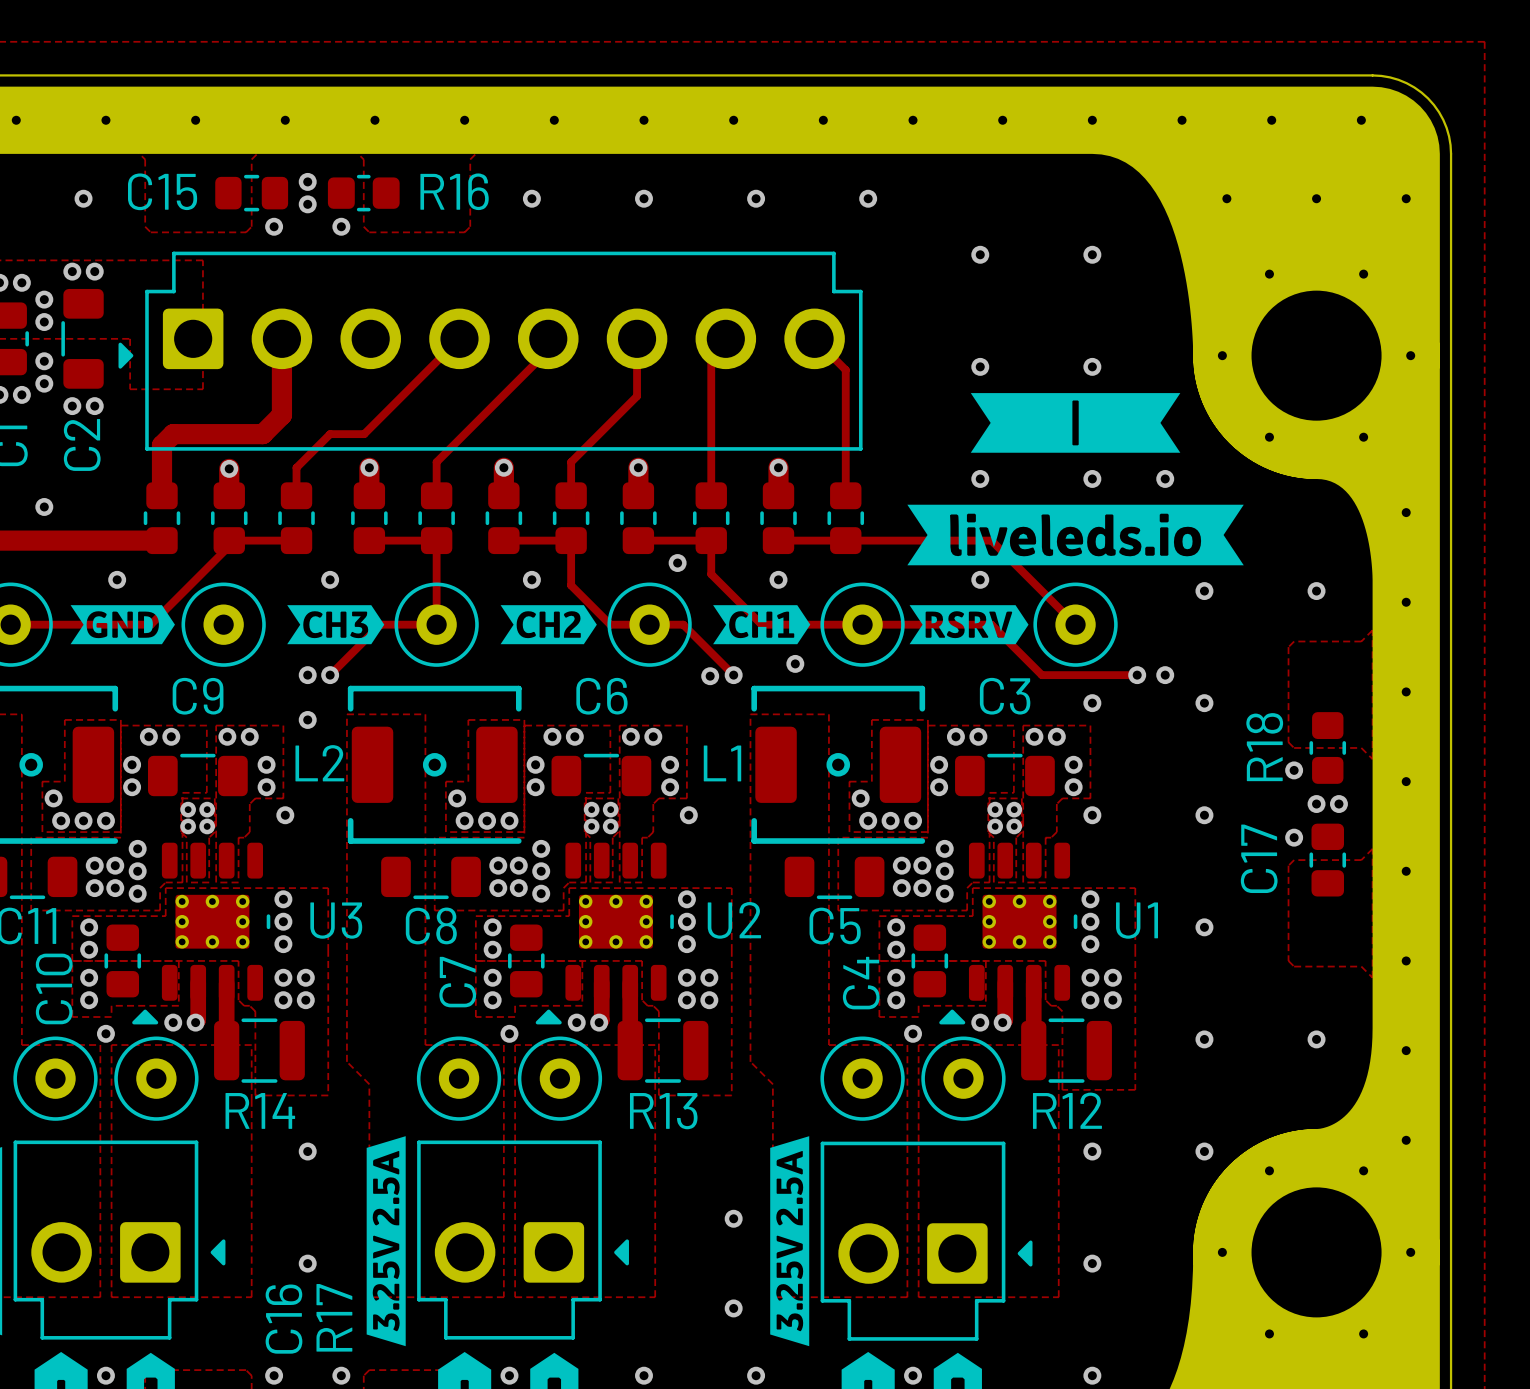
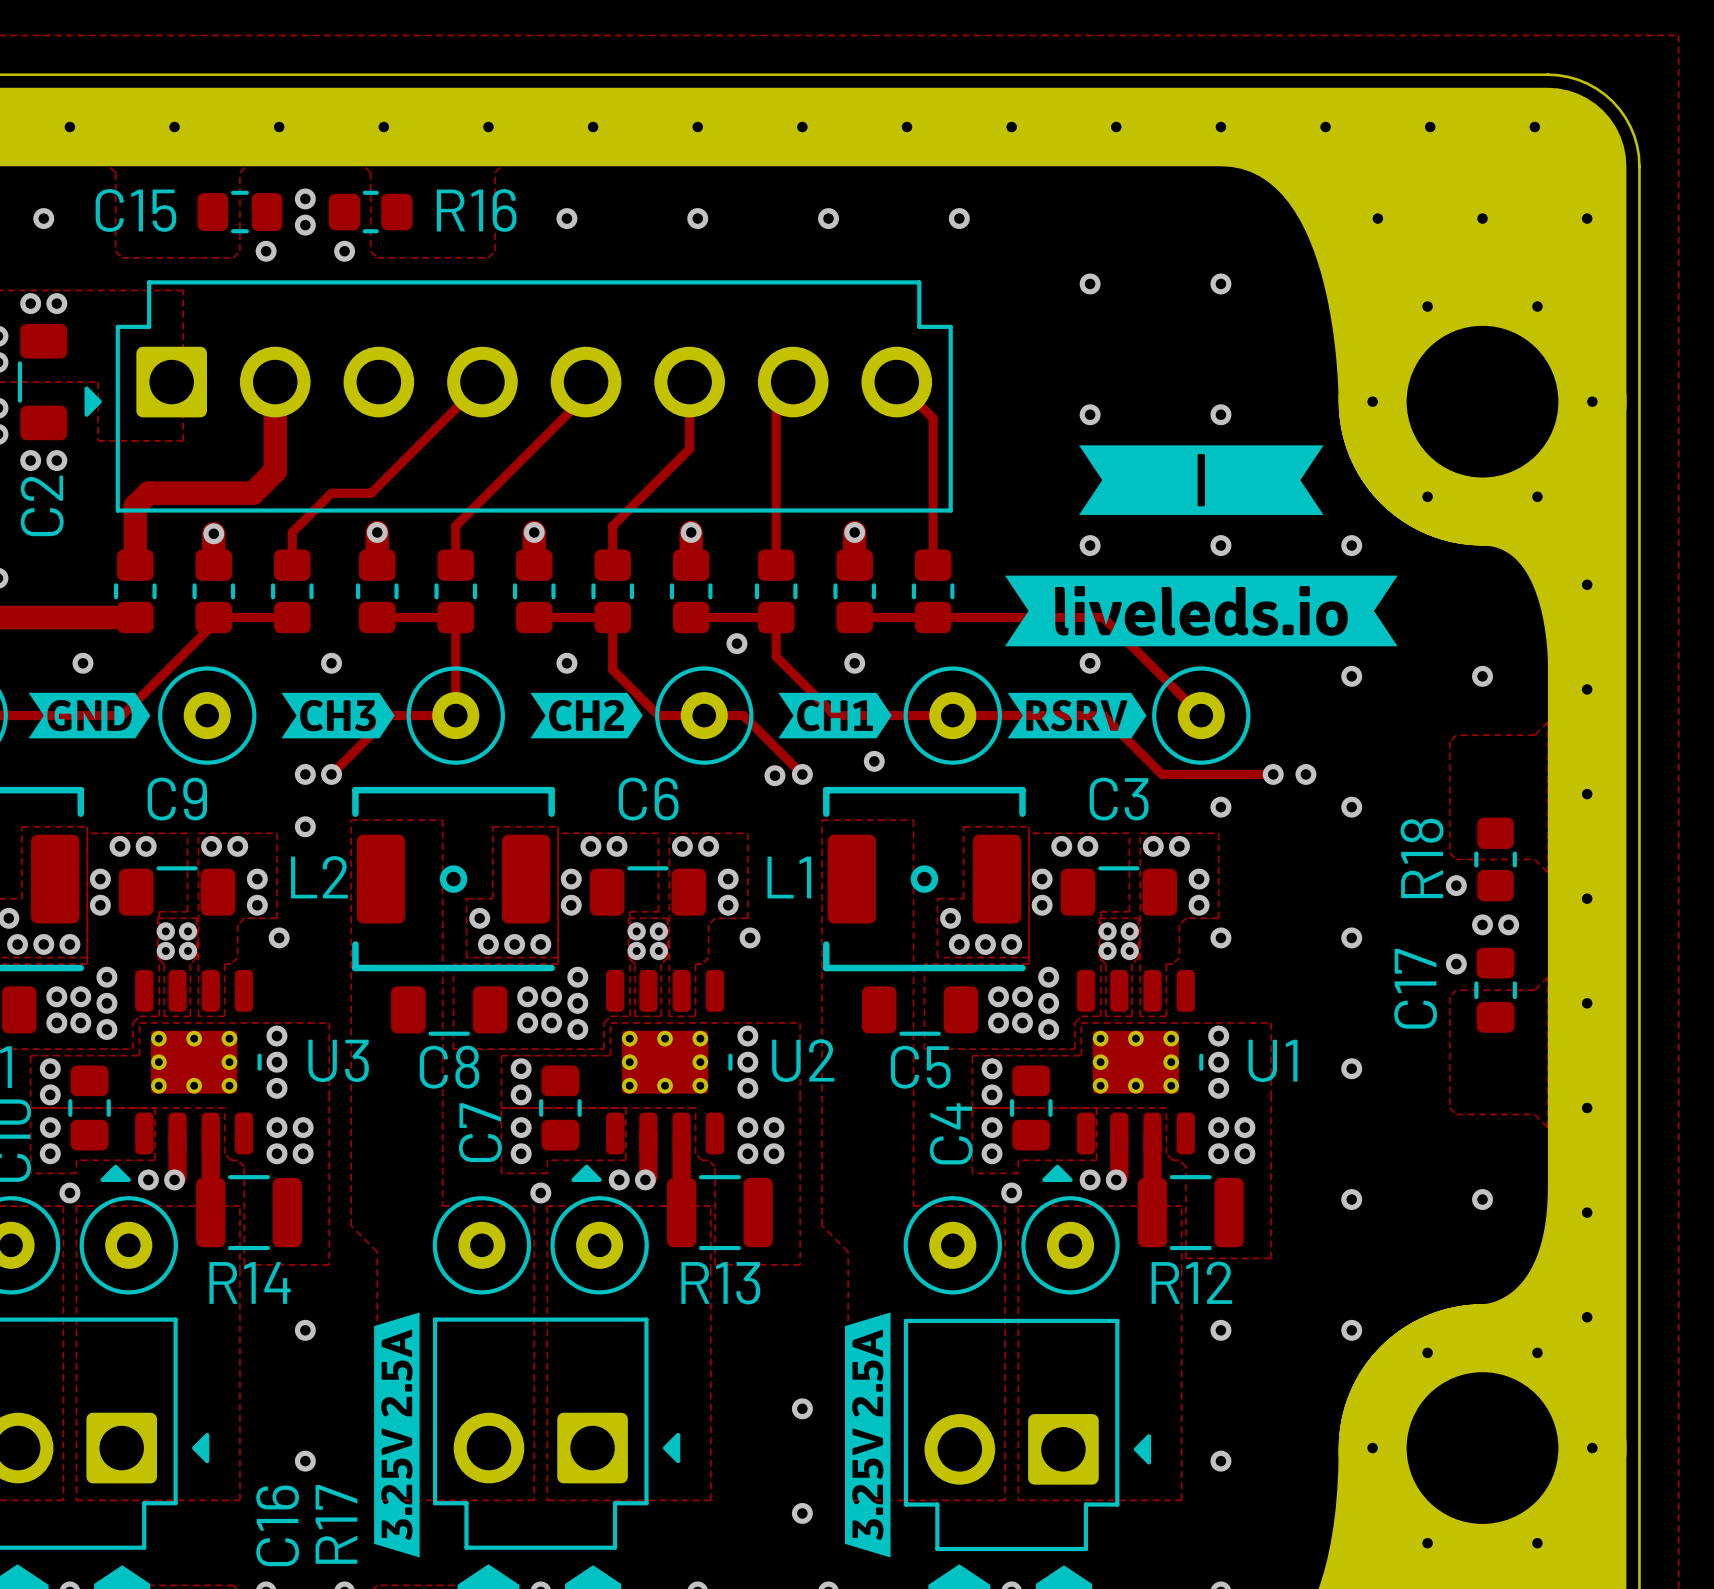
via position: (1165, 478) -> (1351, 545)

